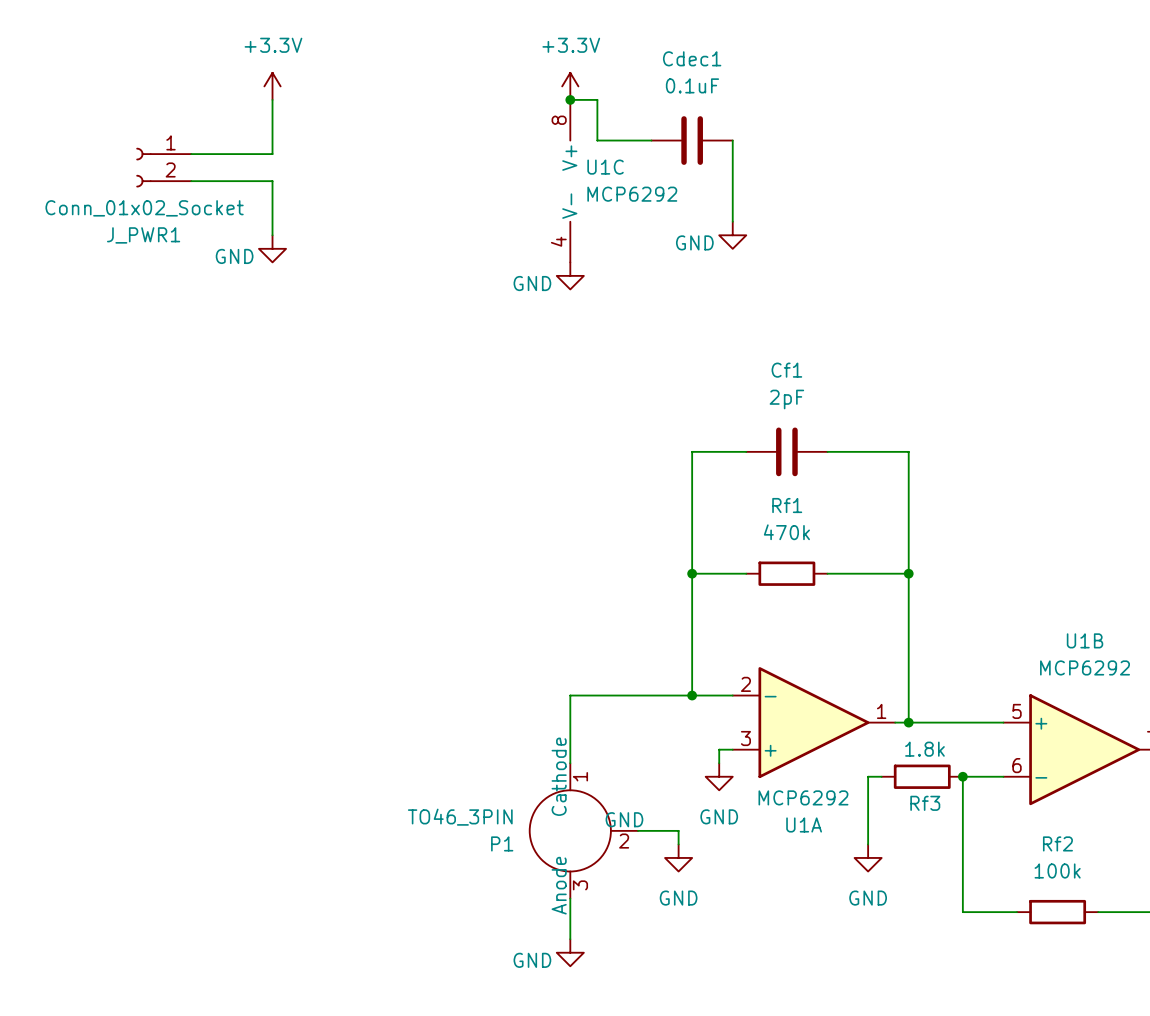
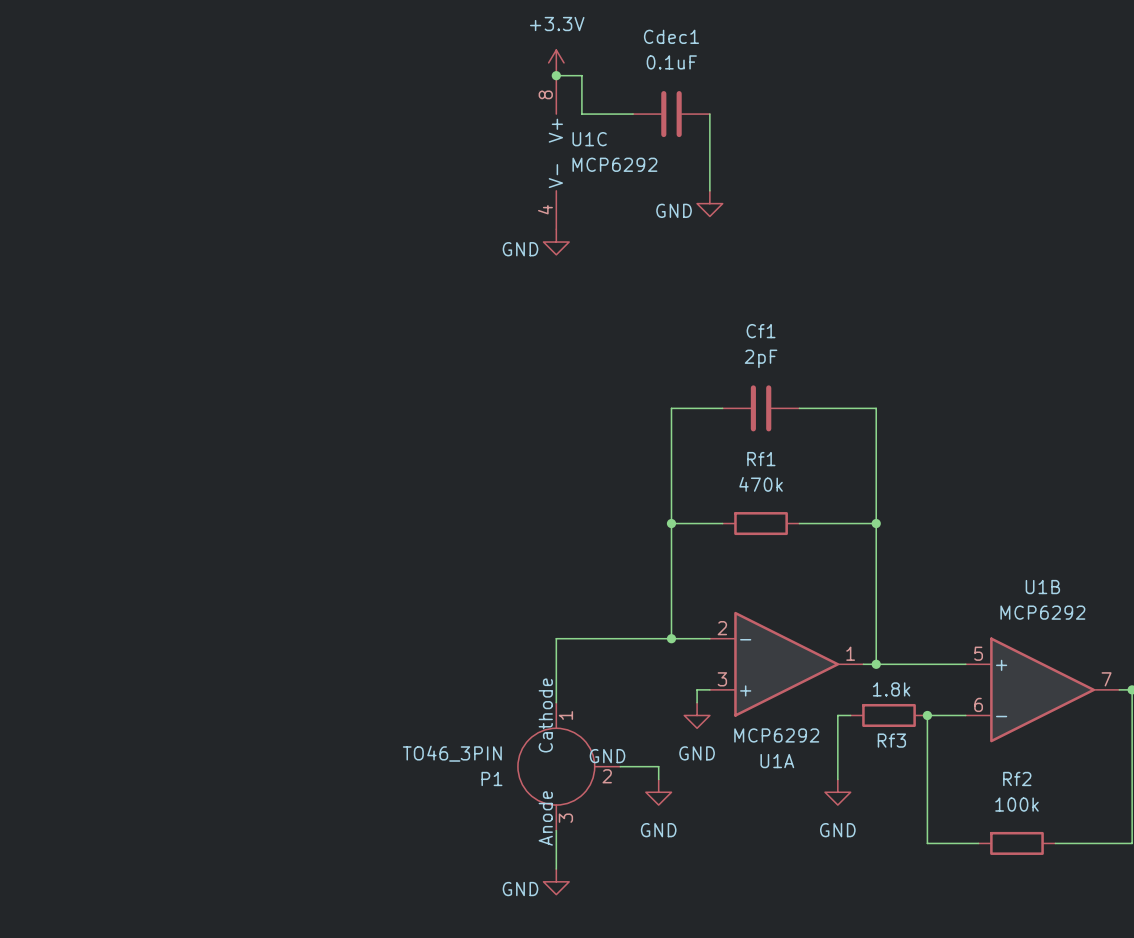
power symbol: +3.3V (272, 86) -> none
wire: (272, 99) (272, 154) (191, 154) -> none
J_PWR1: Conn_01x02_Socket (163, 167) -> none
wire: (191, 181) (272, 181) (272, 235) -> none
power symbol: GND (272, 248) -> none

